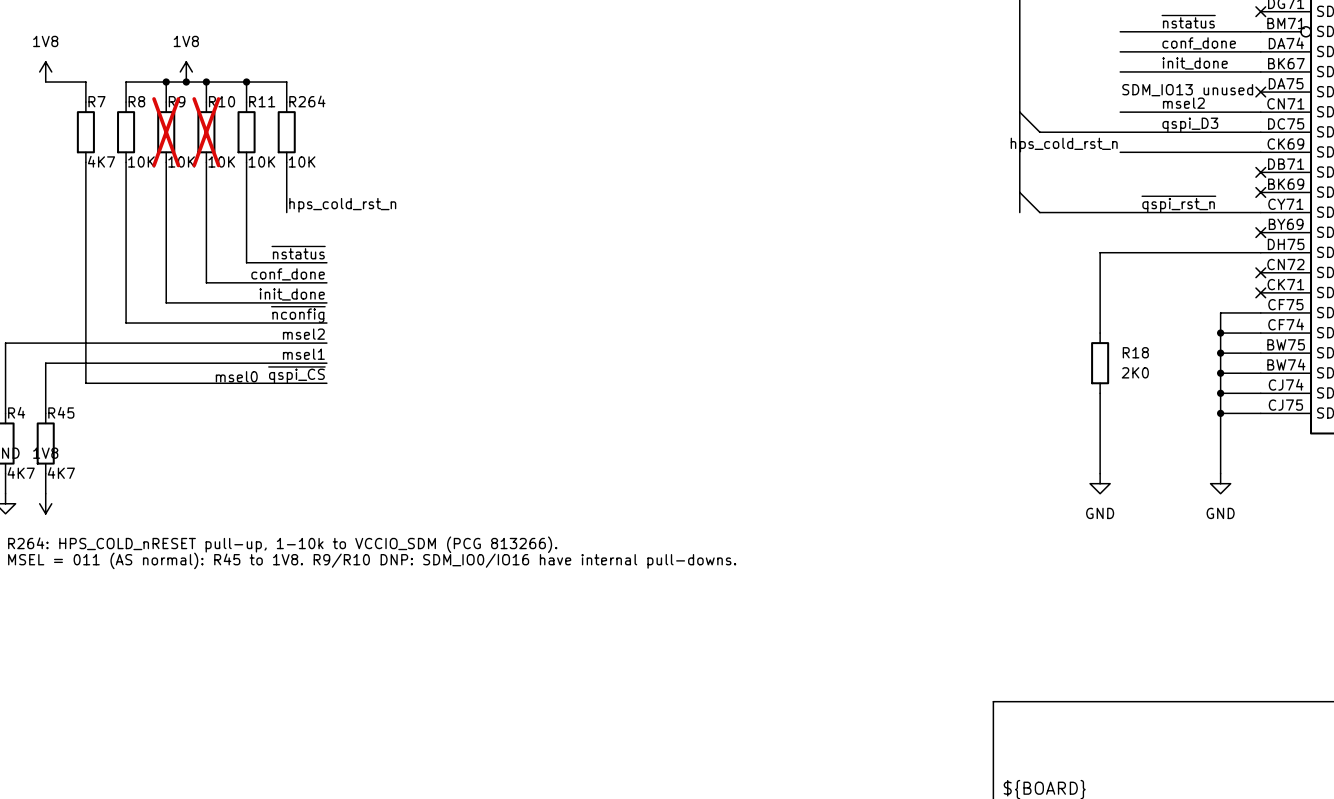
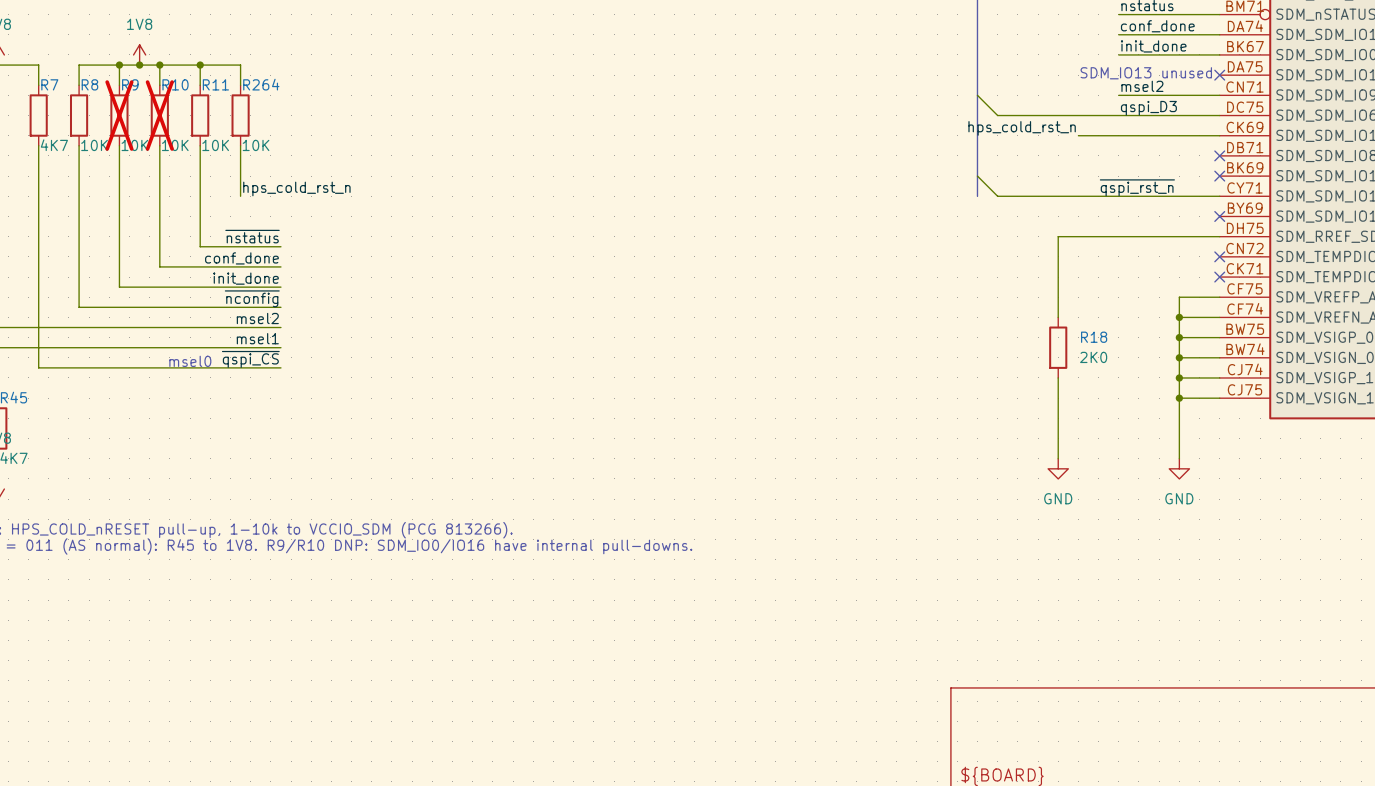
wire: (1120, 31) (1160, 31) -> none
wire: (1120, 51) (1160, 51) -> none
wire: (1120, 71) (1160, 71) -> none
wire: (1120, 112) (1160, 112) -> none

